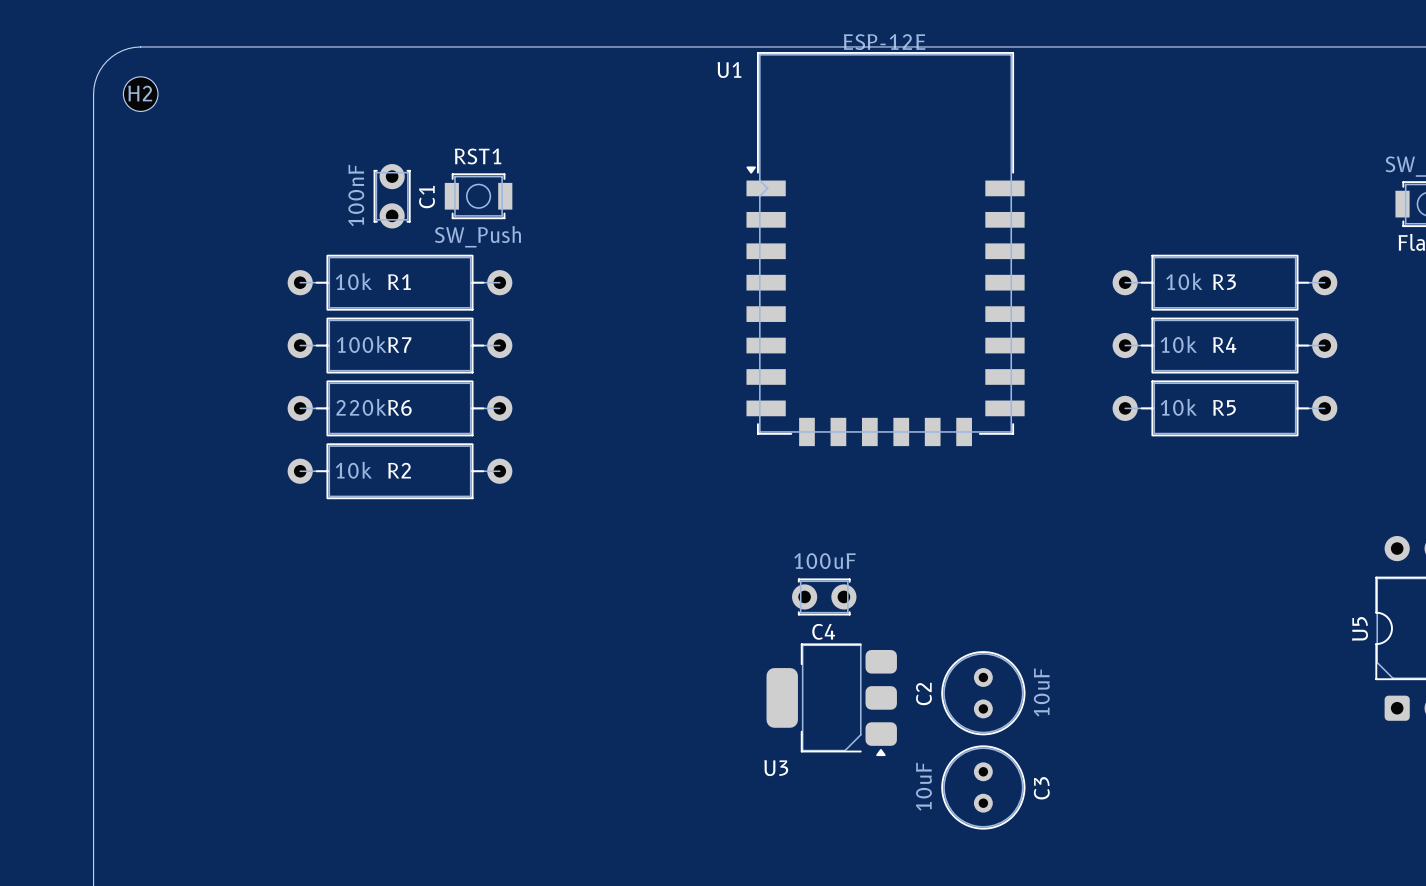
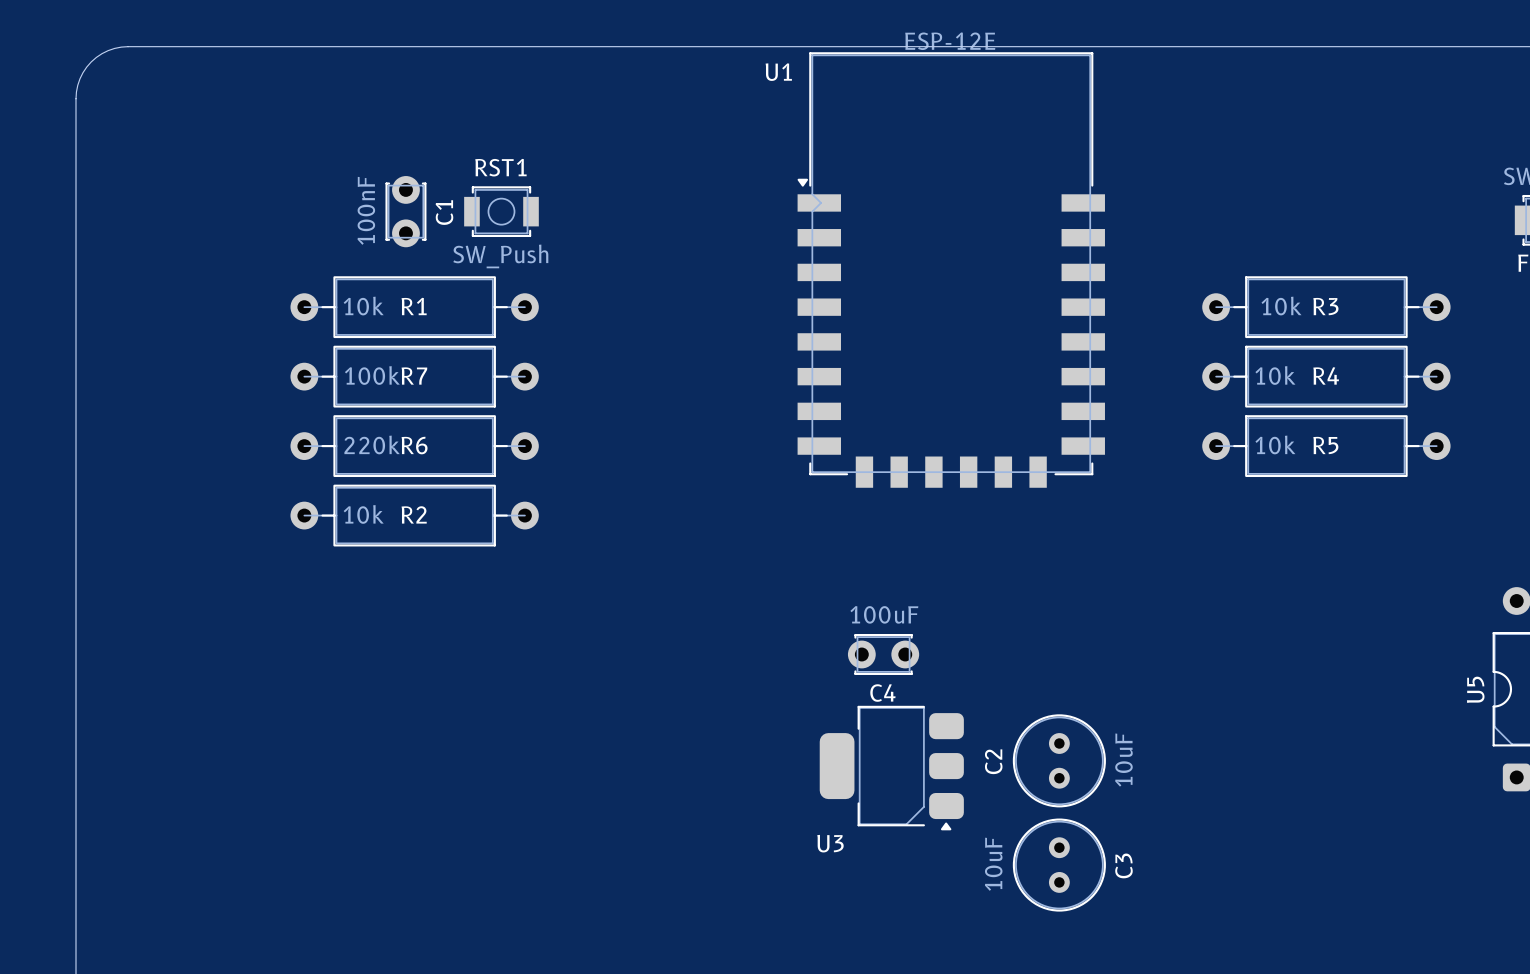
H2: (140, 94) -> none

